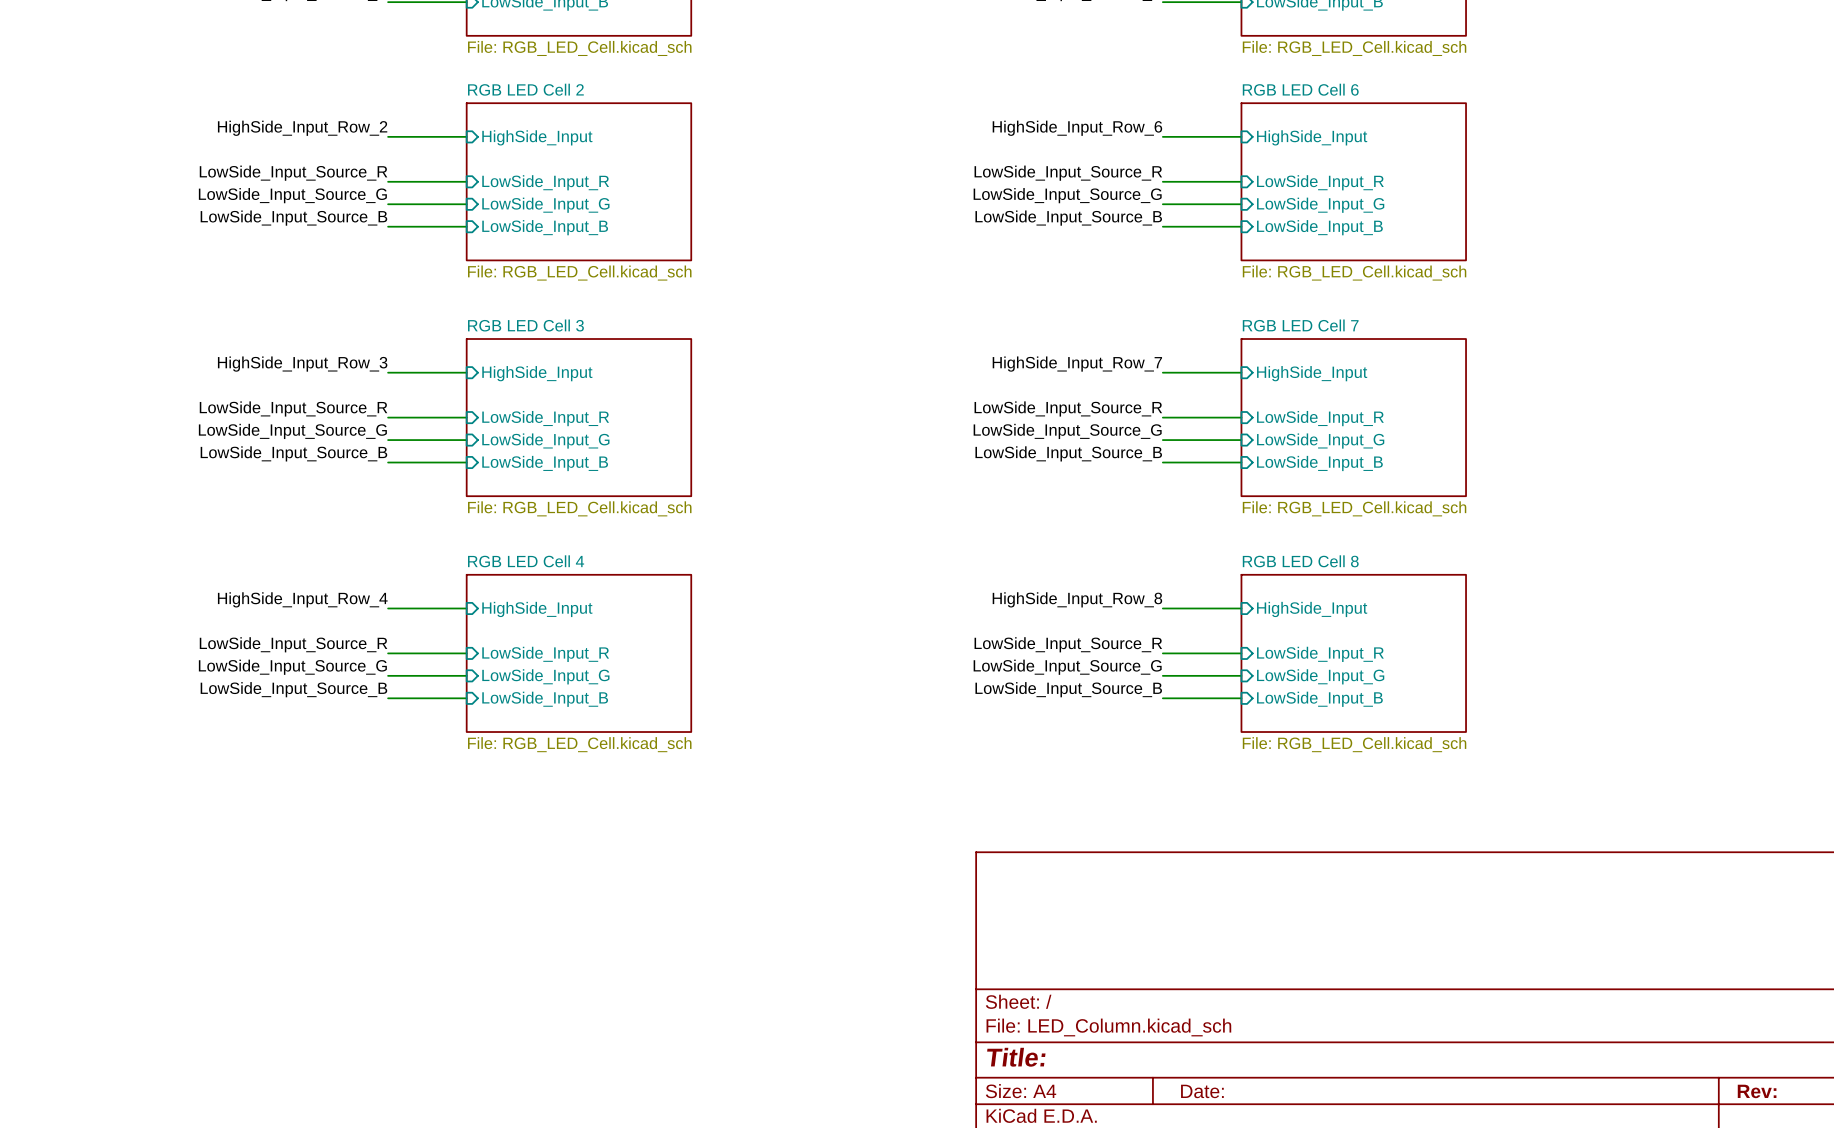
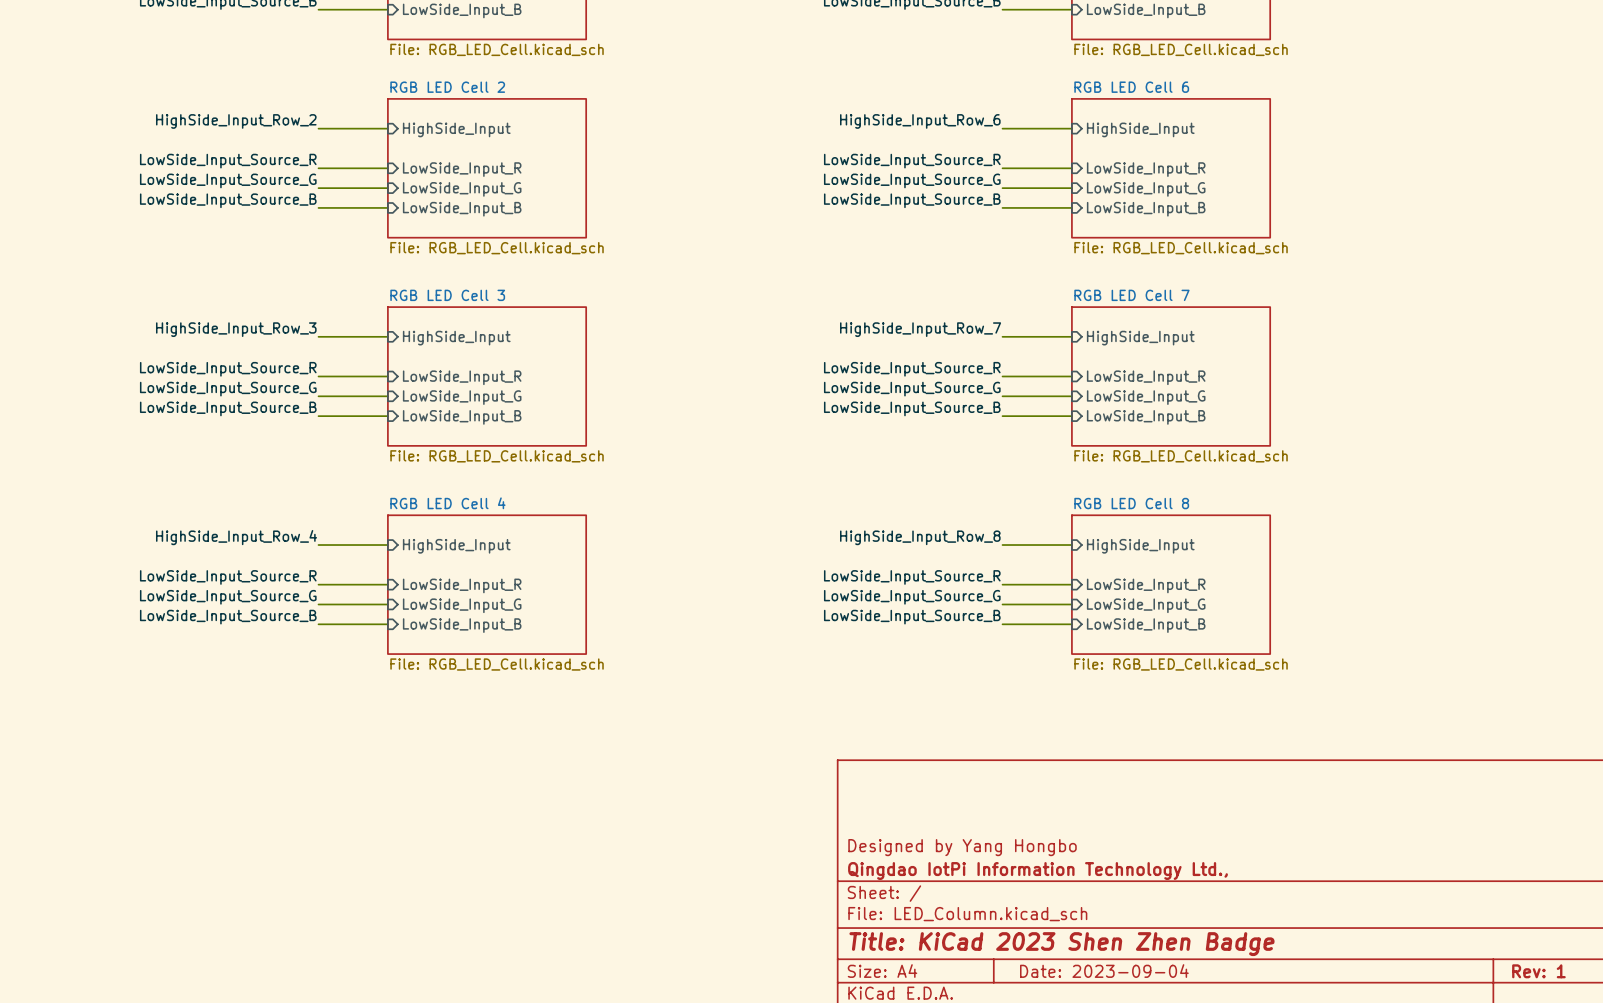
title block: none -> Designed by Yang Hongbo (962, 847)
title block: none -> Qingdao IotPi Information Technology Ltd., (1037, 871)
title block: Title: (1016, 1057) -> Title: KiCad 2023 Shen Zhen Badge (1062, 944)
title block: Date: (1202, 1091) -> Date: 2023-09-04 (1104, 971)
title block: Rev: (1757, 1091) -> Rev: 1 (1538, 971)

